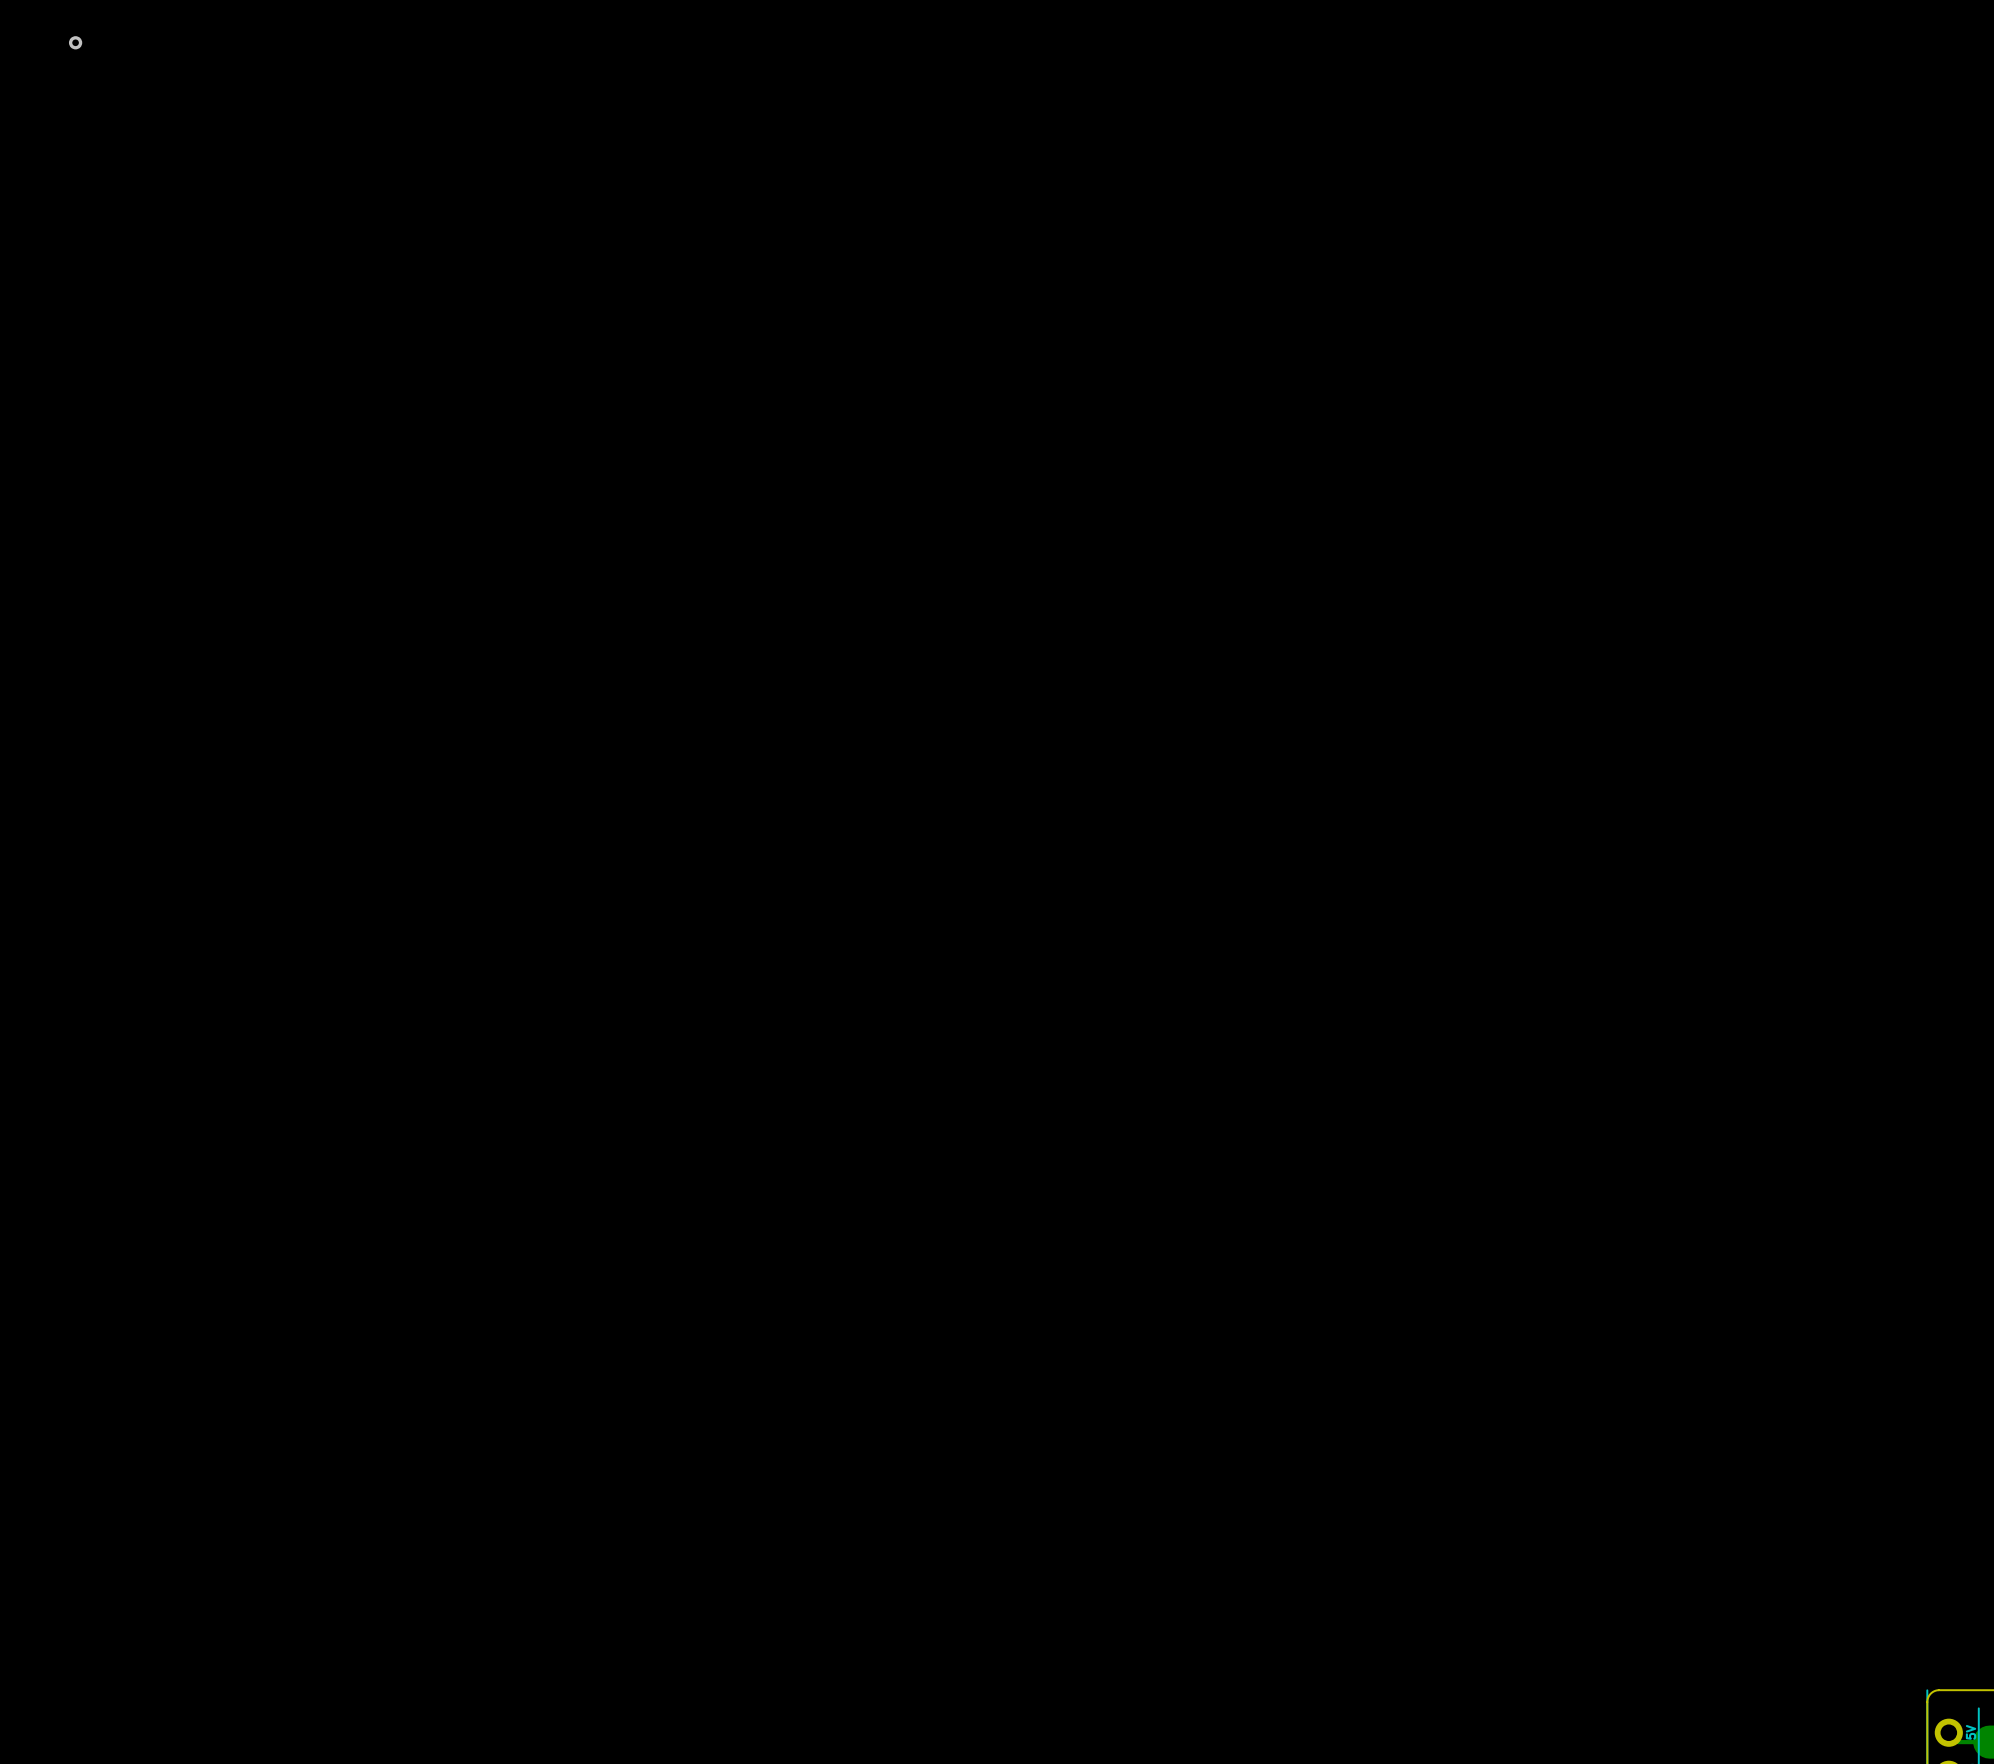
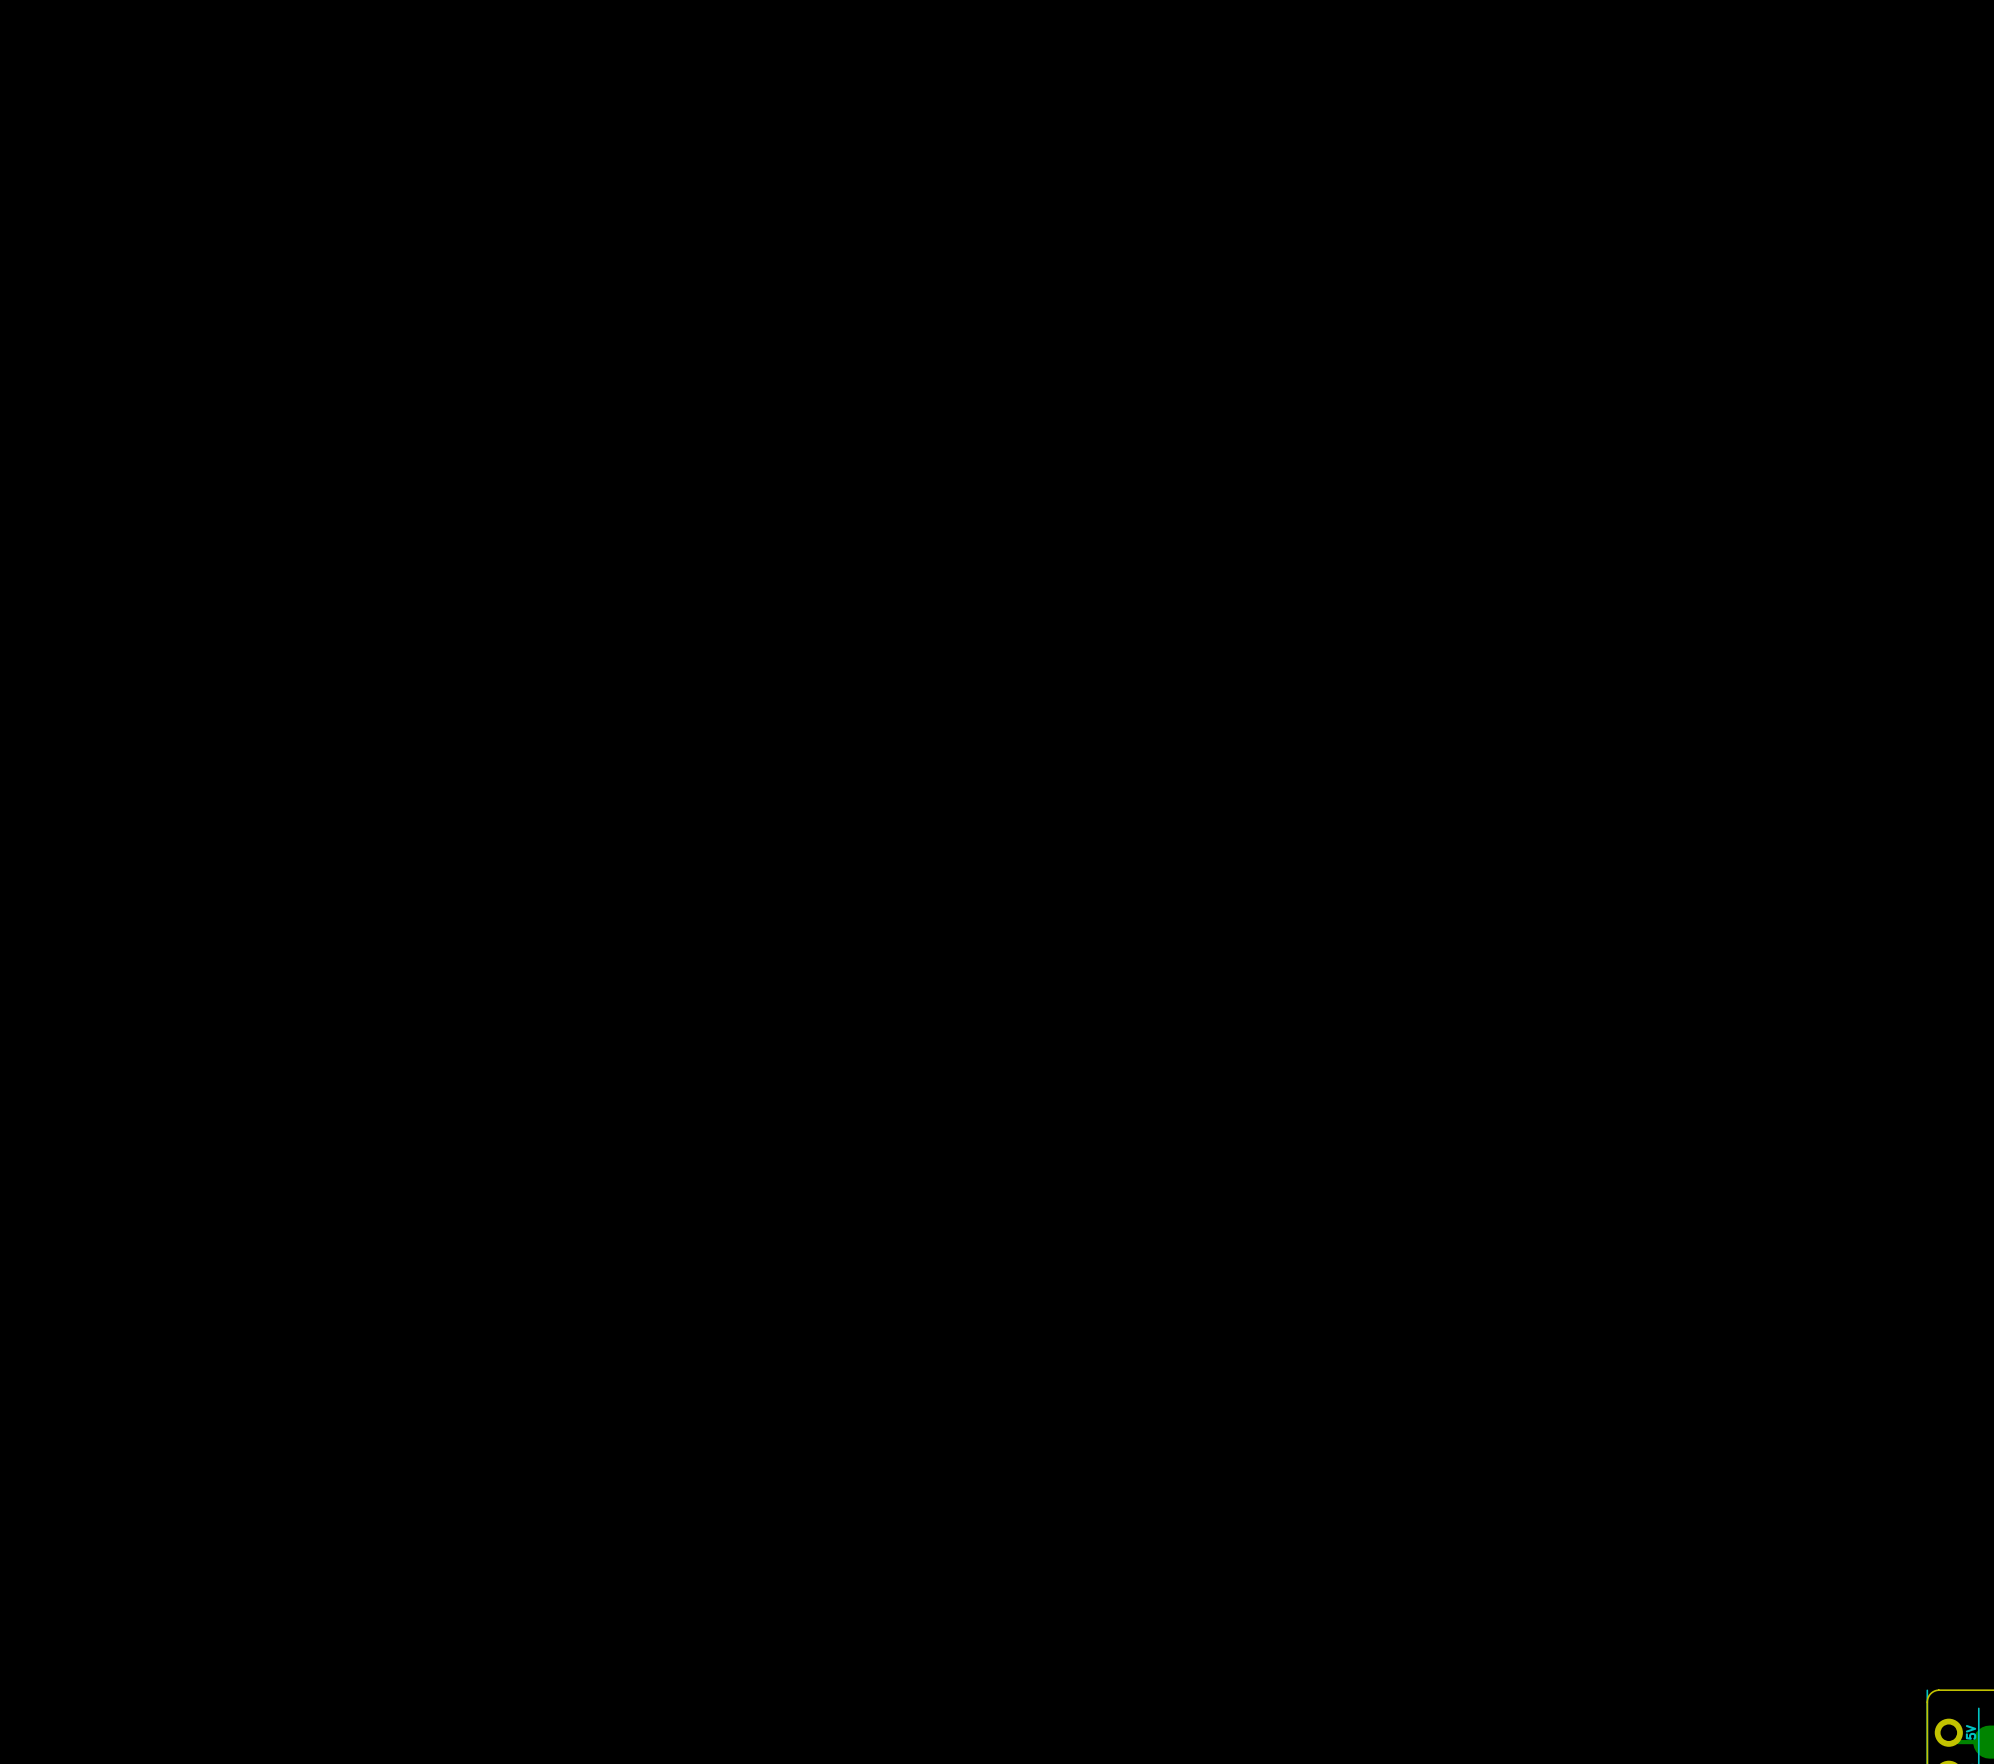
via: (75, 42) -> none

